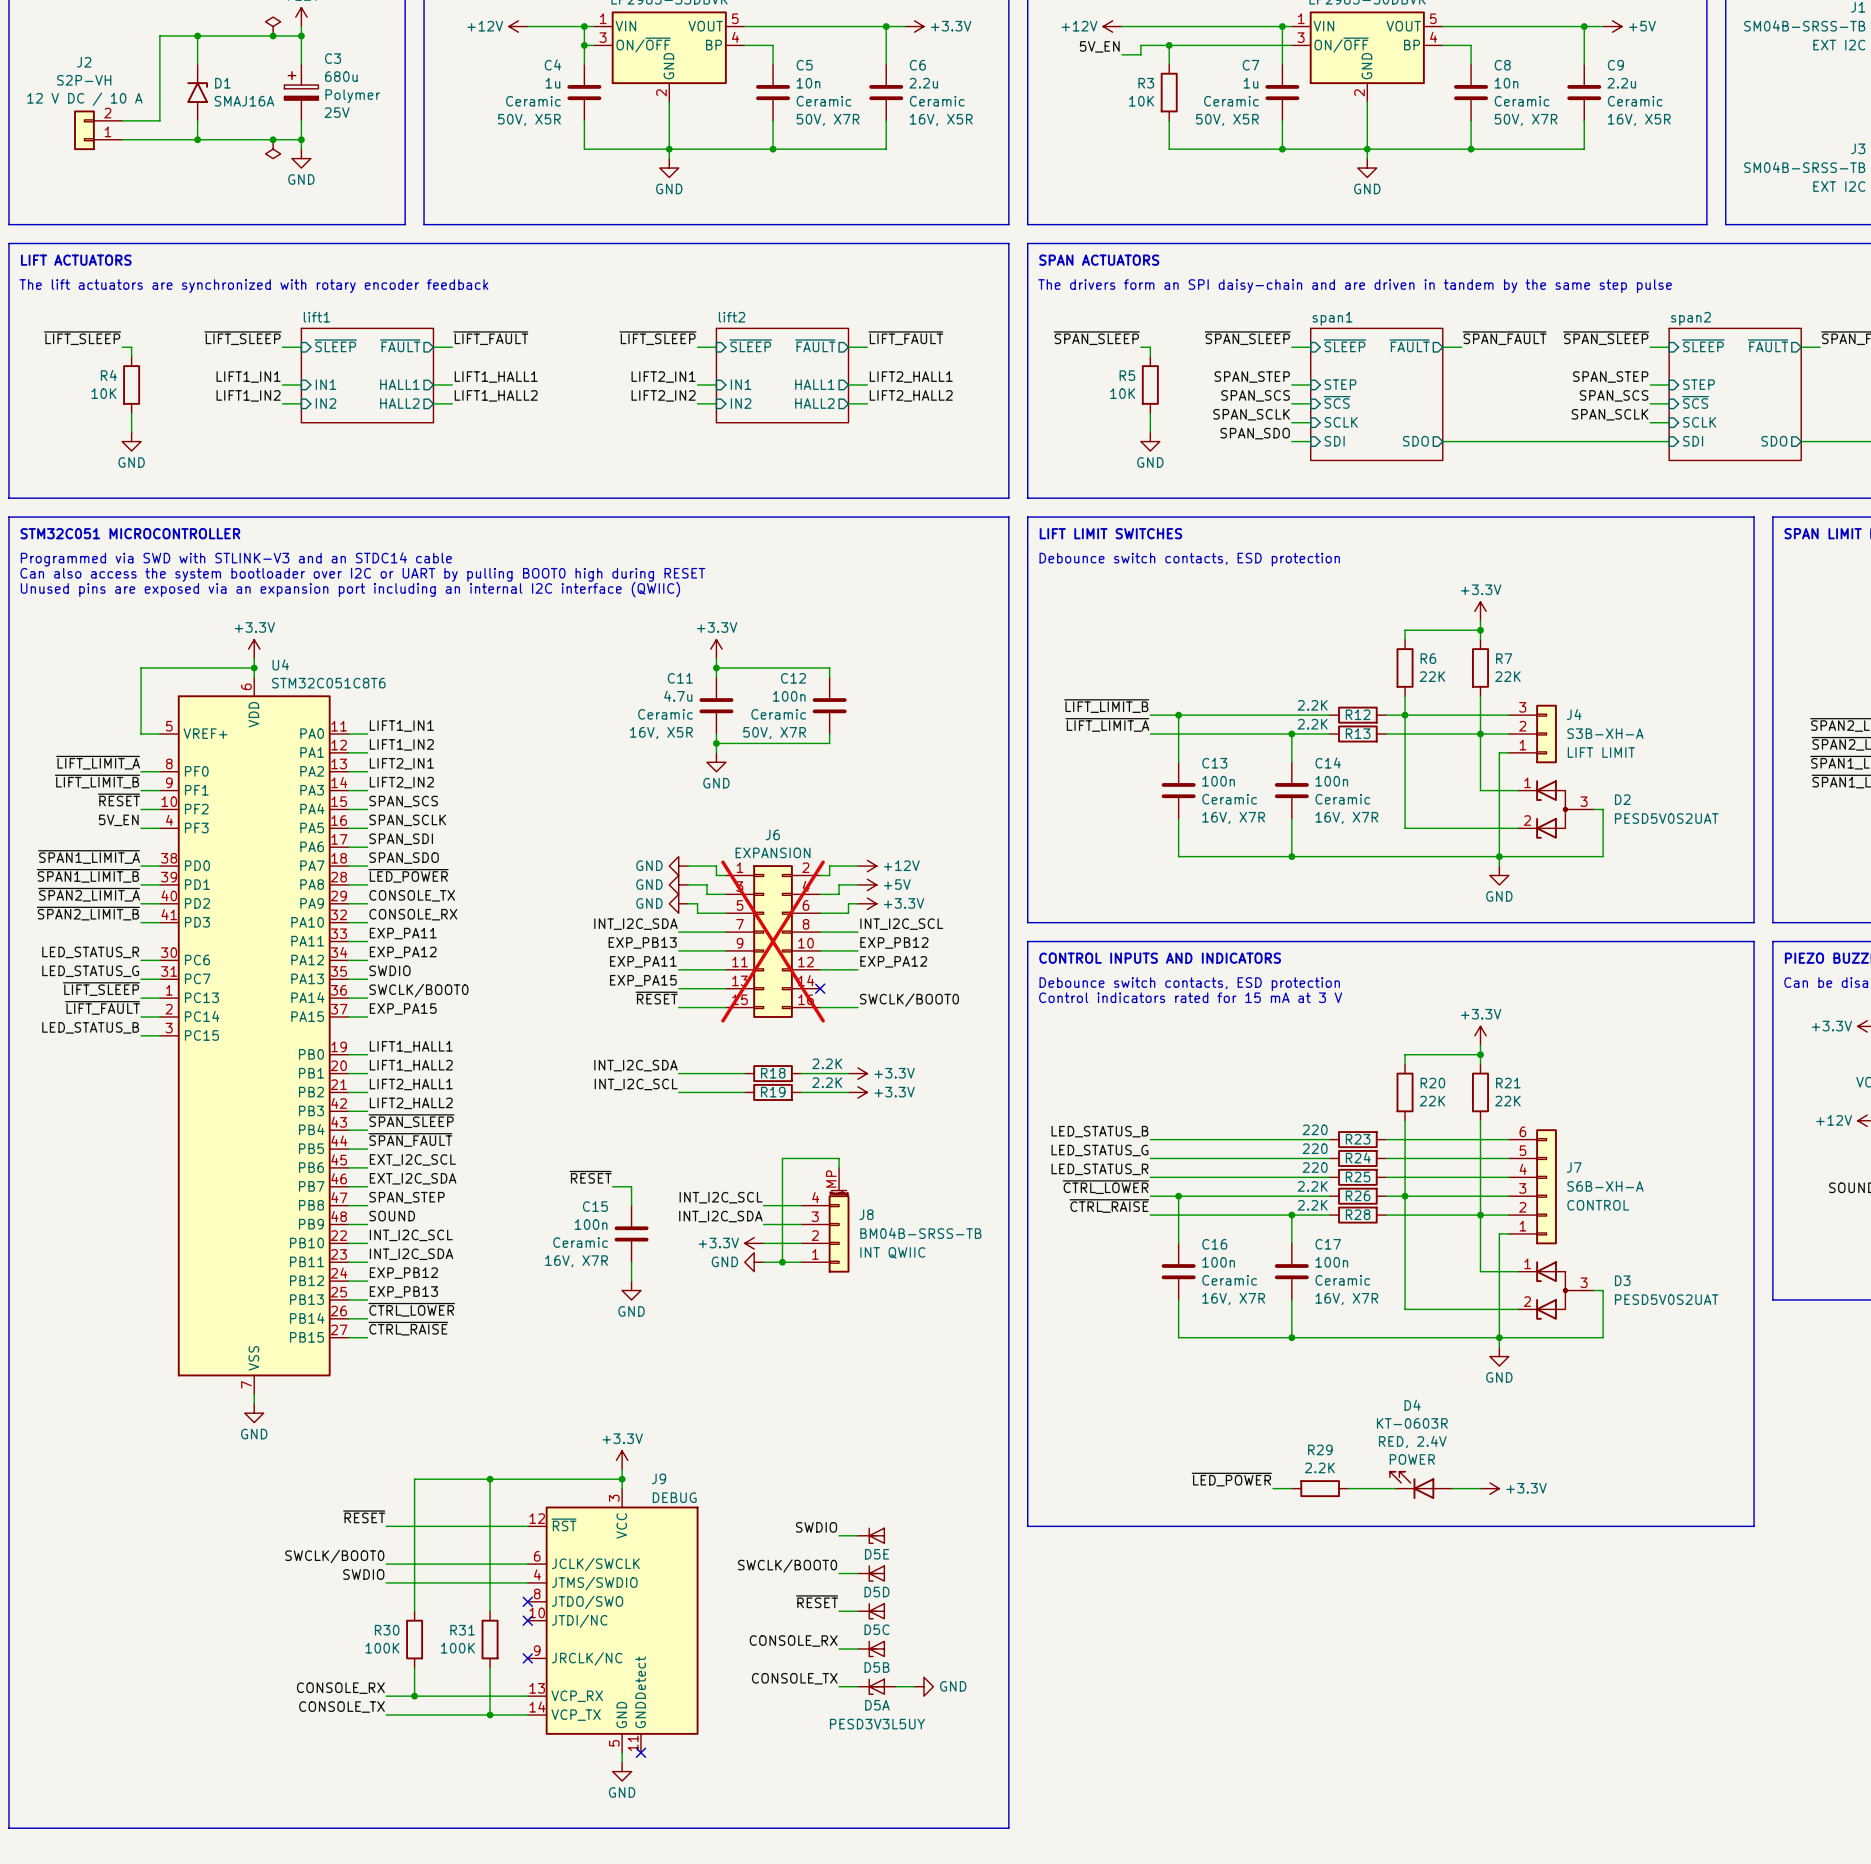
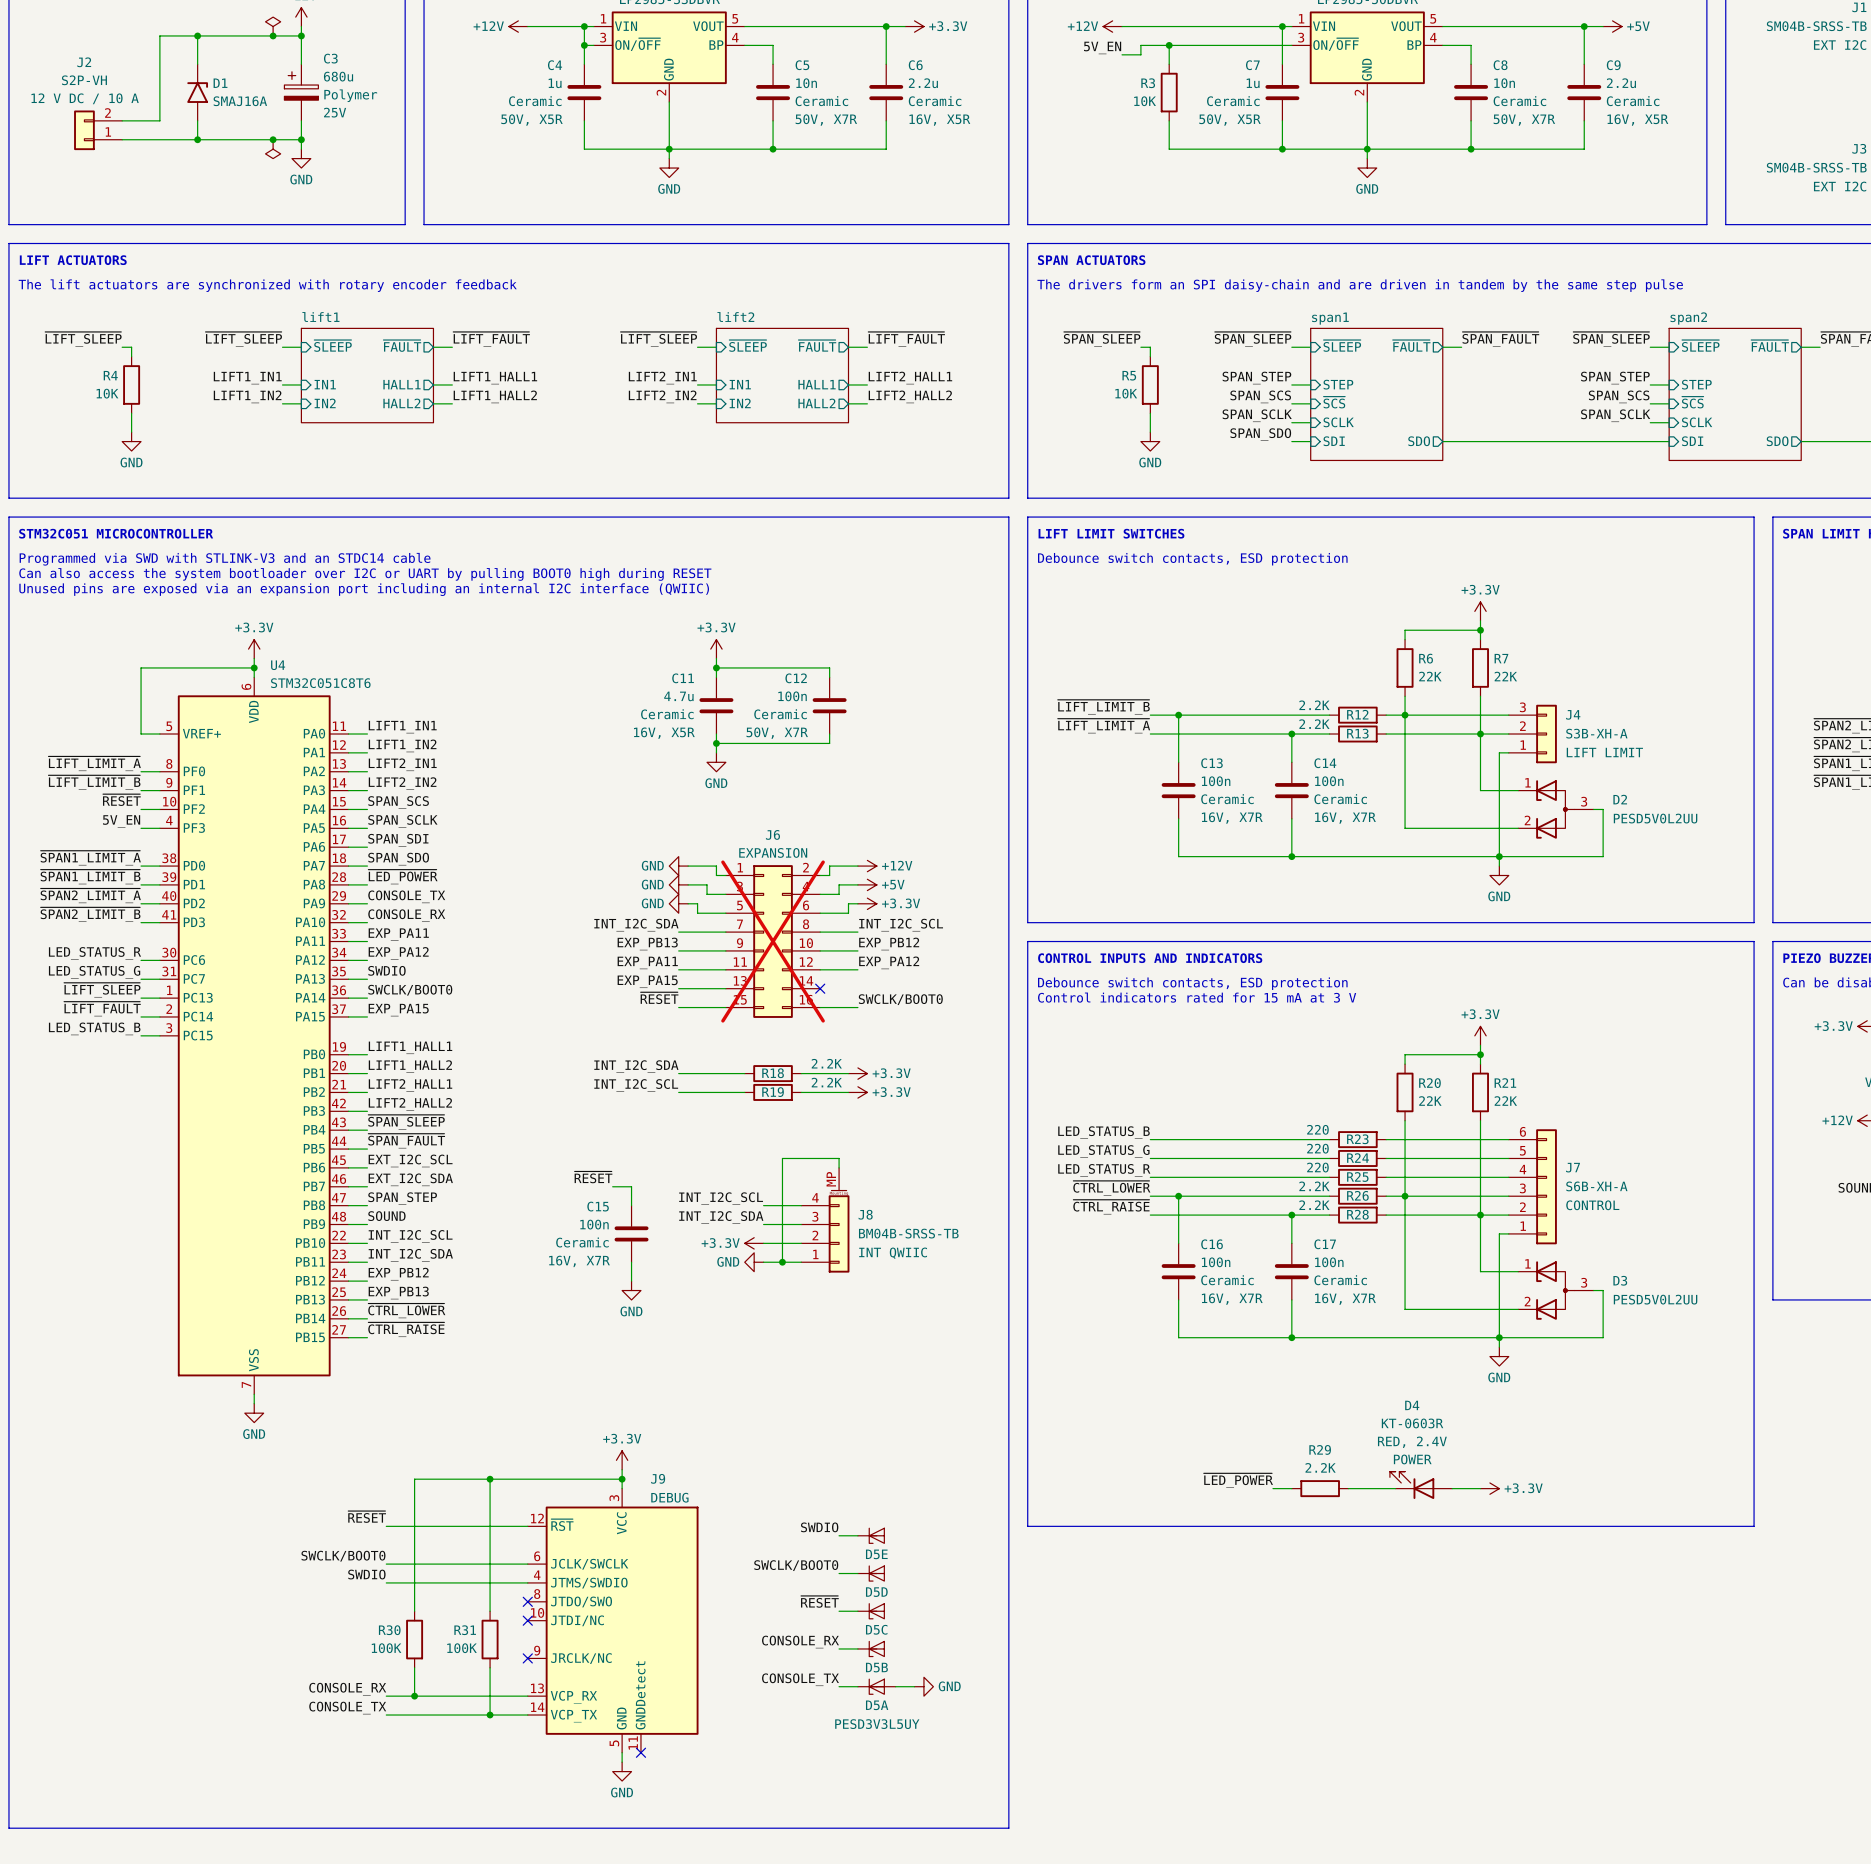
D2 value: PESD5V0S2UAT (1666, 818) -> PESD5V0L2UU (1655, 818)
D3 value: PESD5V0S2UAT (1666, 1299) -> PESD5V0L2UU (1655, 1299)

